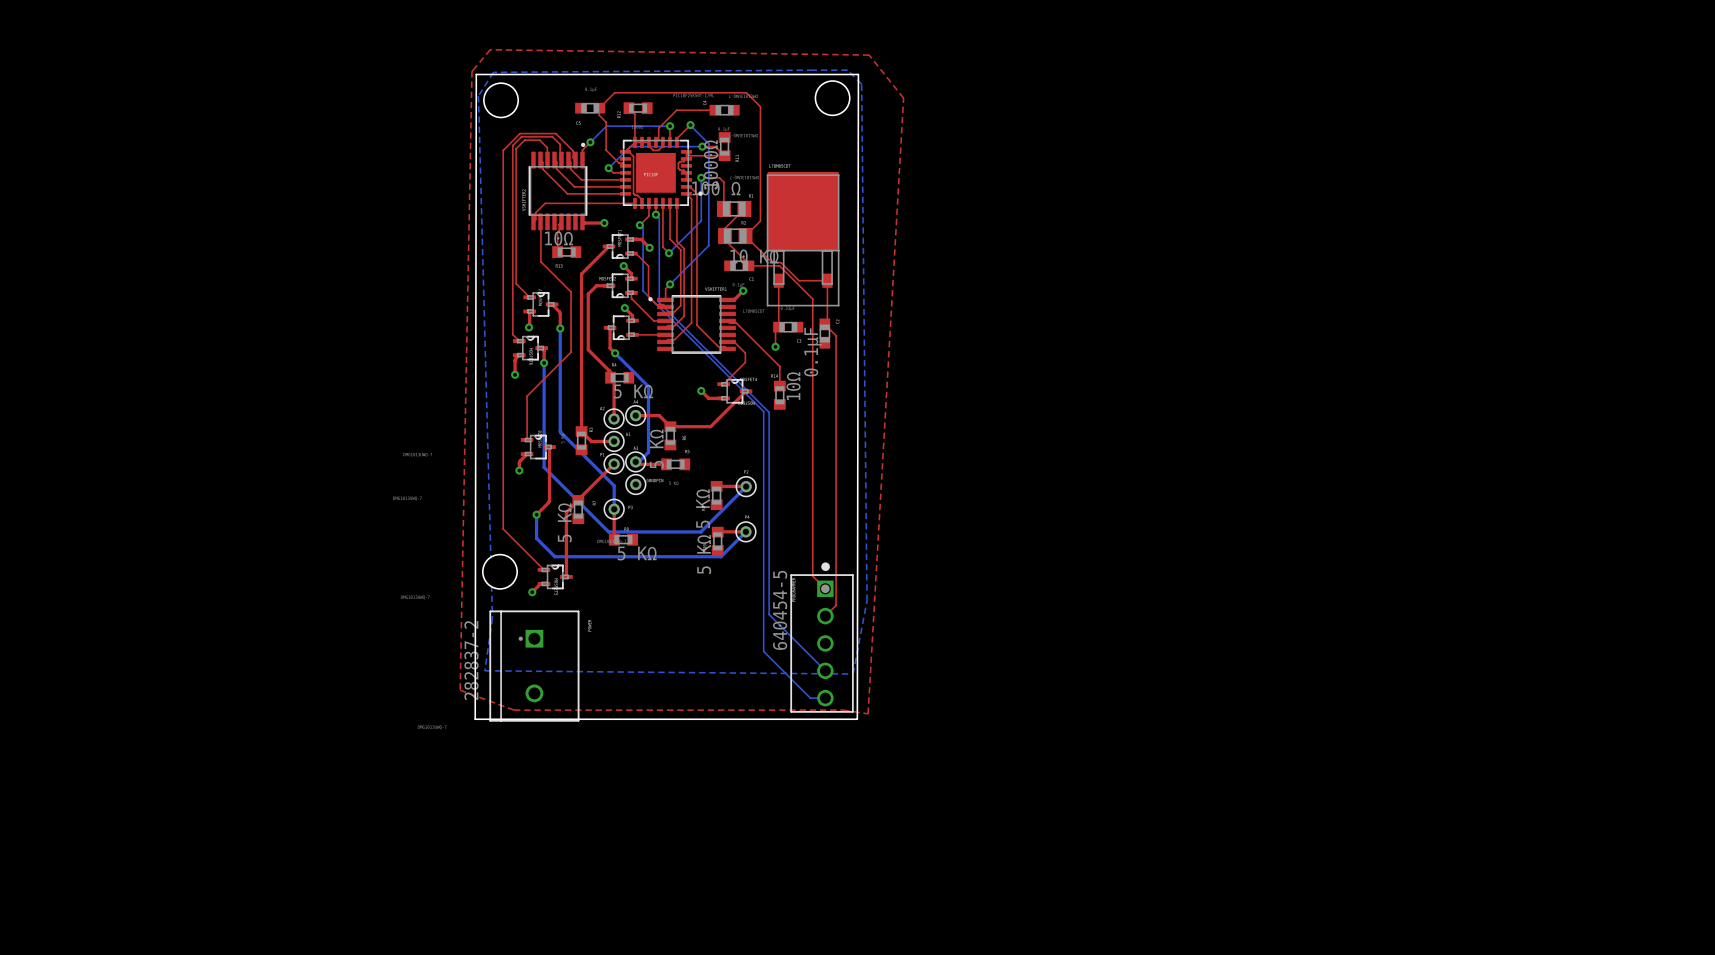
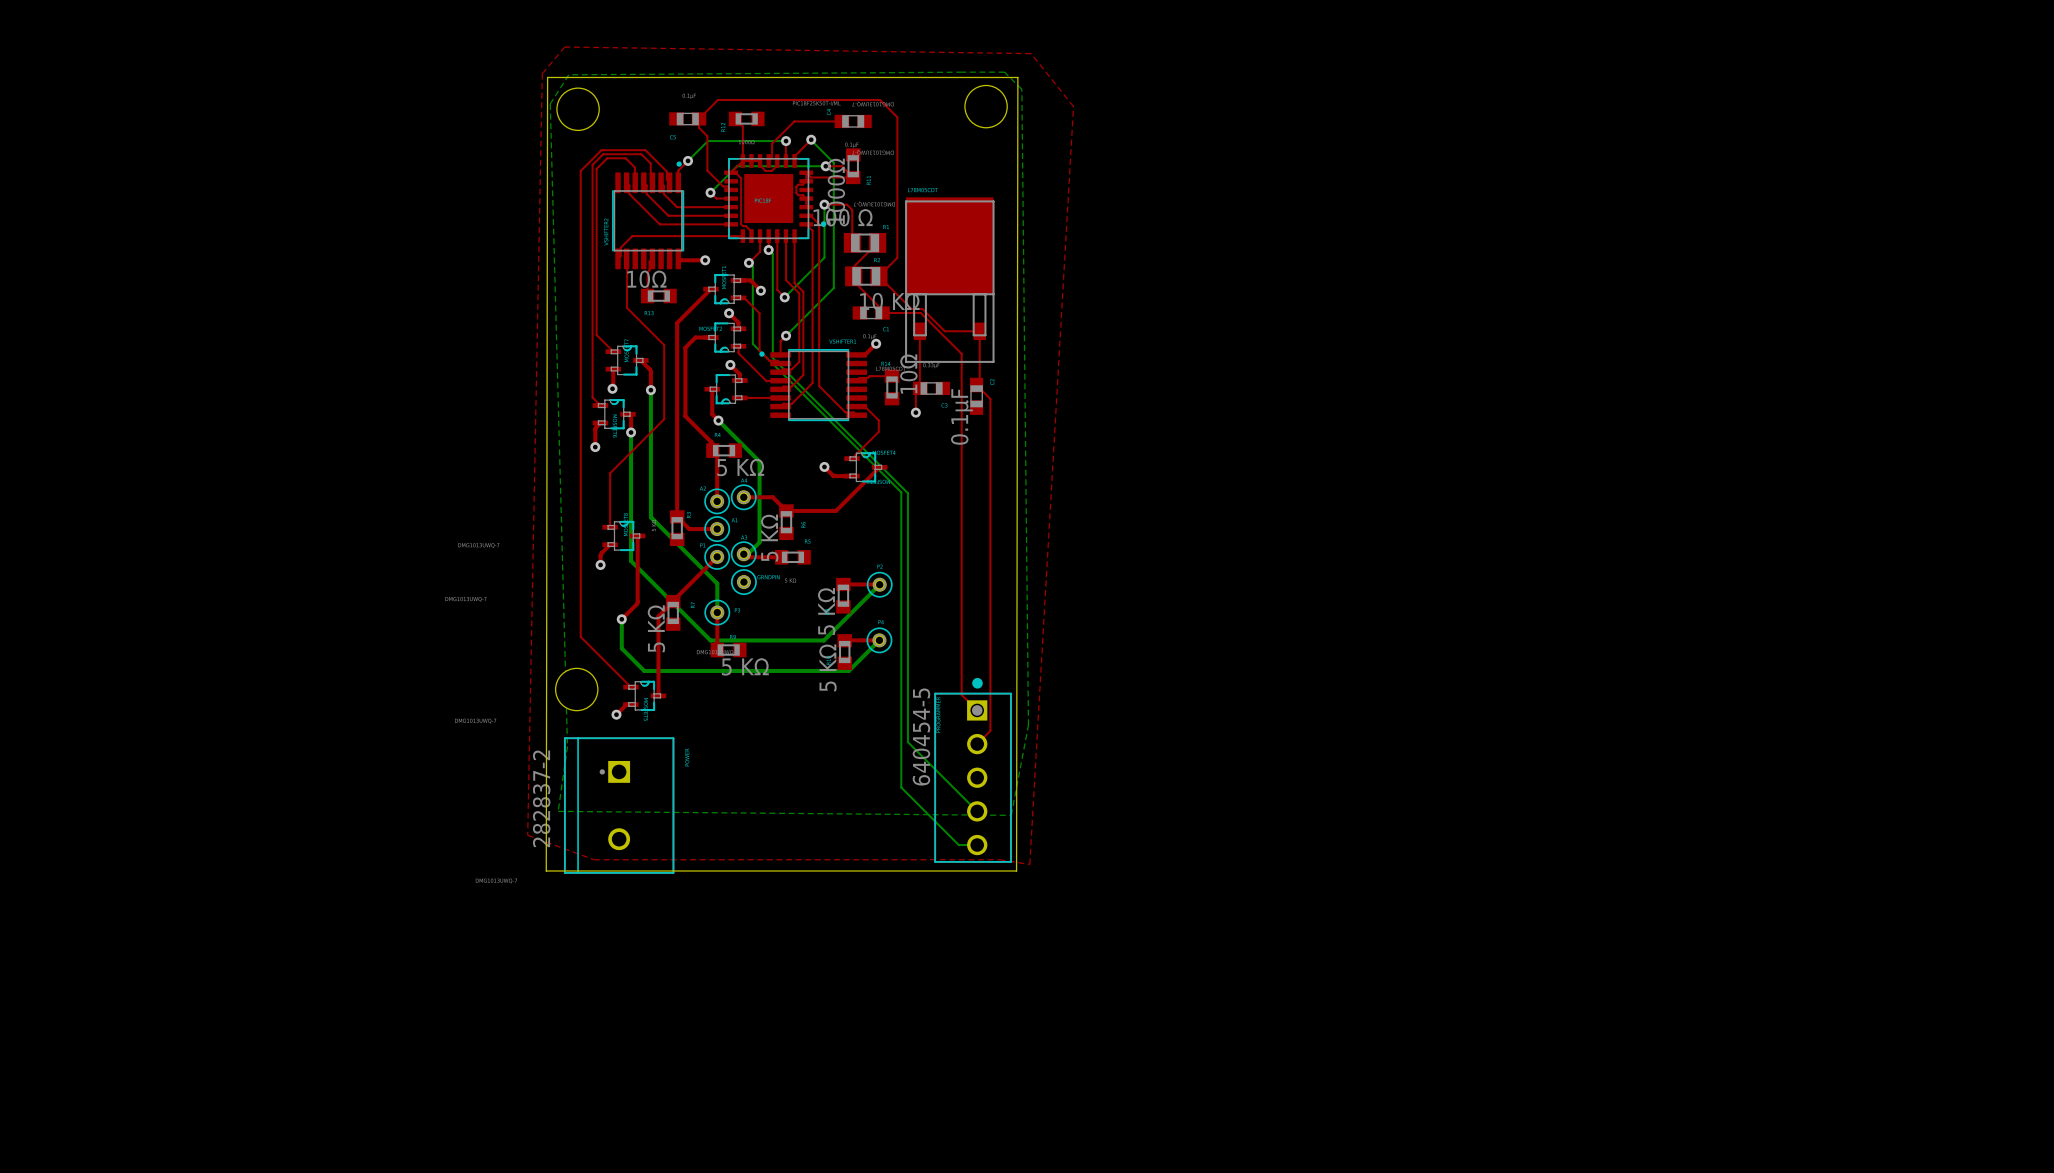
top track: (727, 320) (729, 323) (736, 323) (779, 366) (779, 386) -> (856, 380) (859, 377) (869, 376) (892, 376)
part position: (779, 395) -> (892, 387)

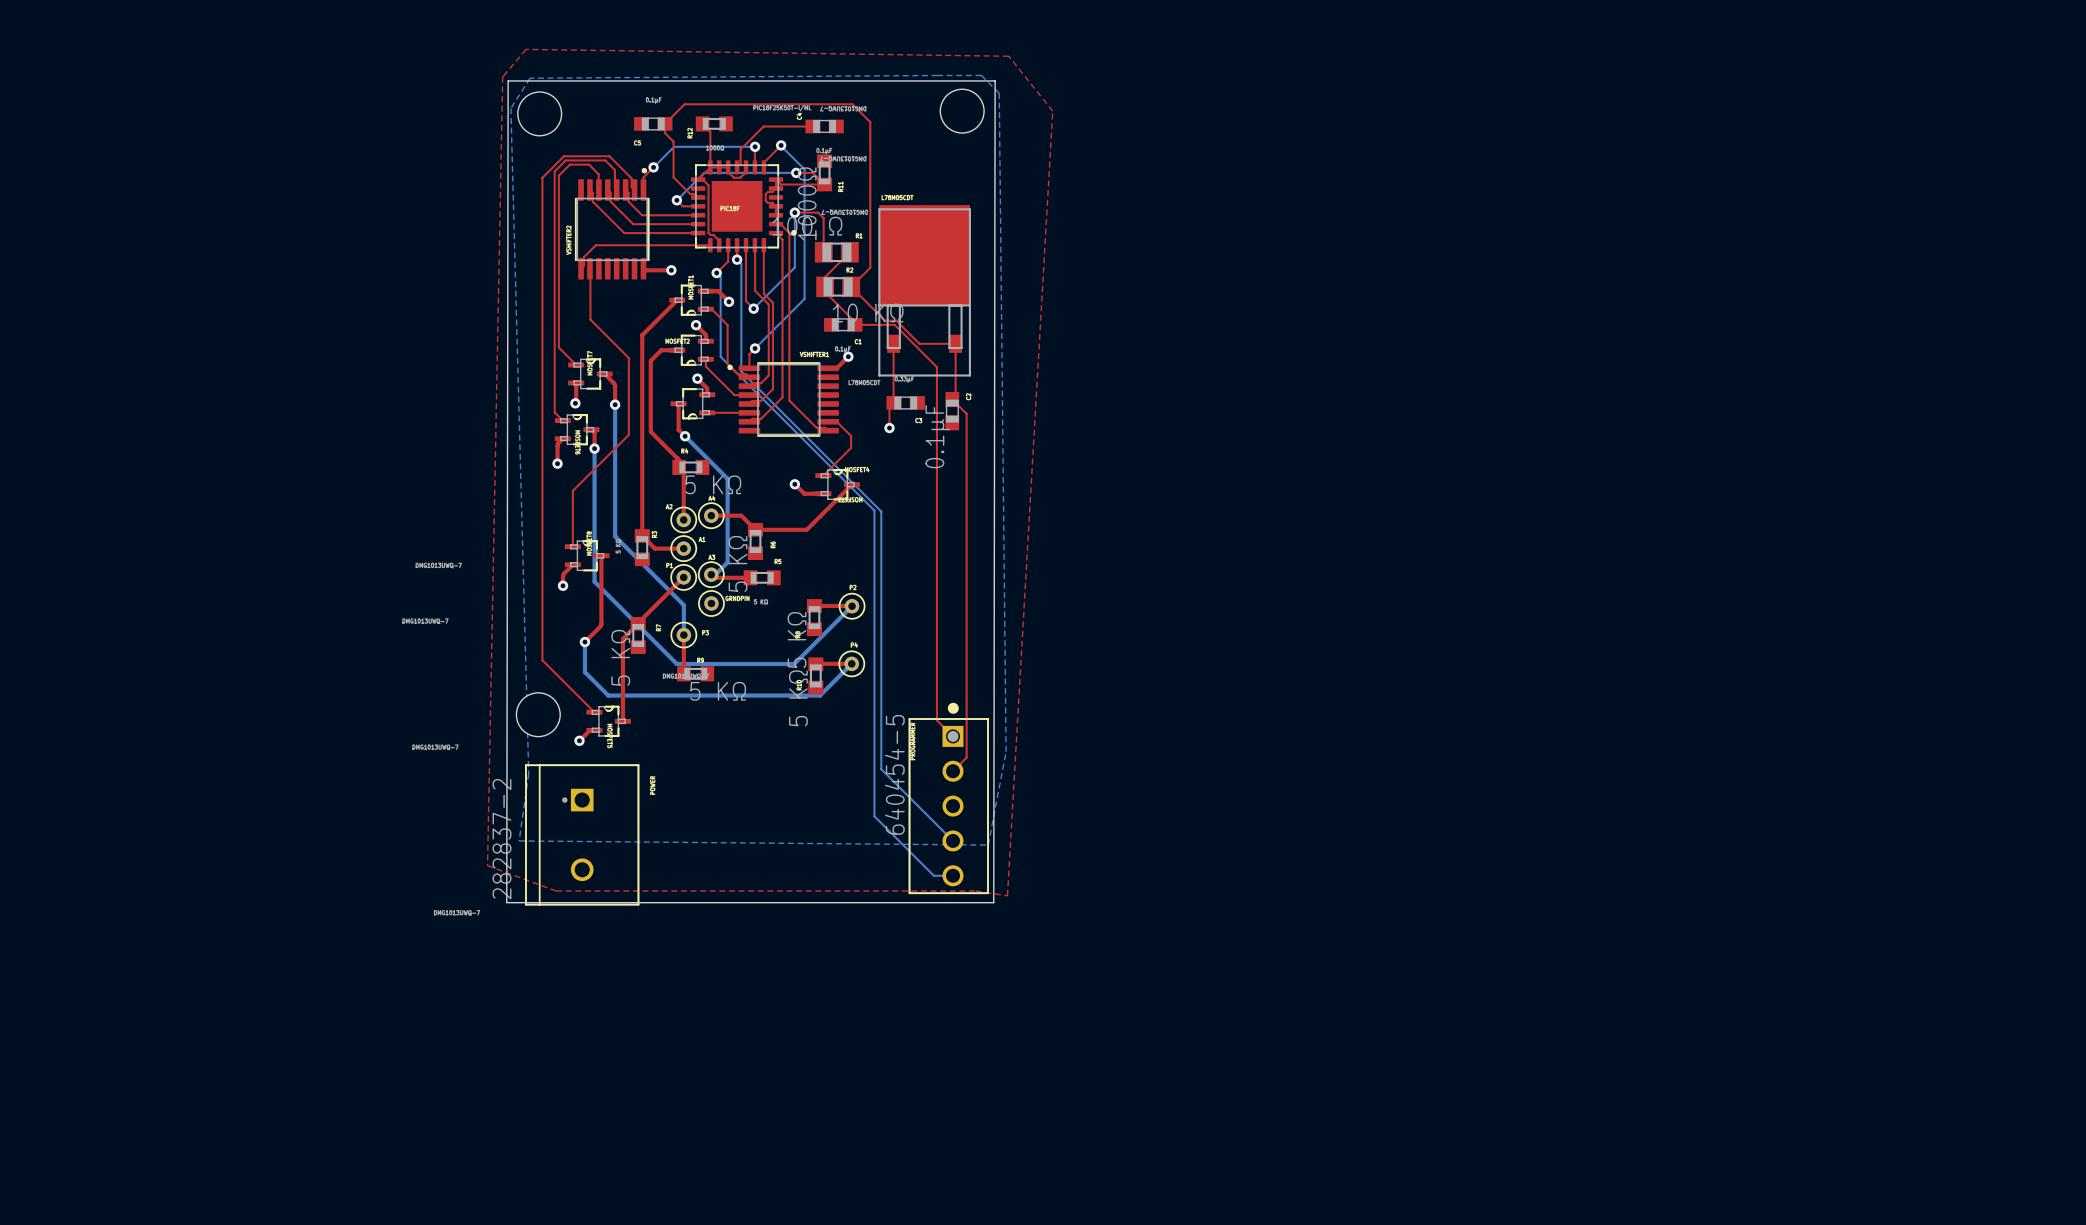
top track: (652, 258) (649, 261) (649, 270) (647, 272) (647, 296) -> none
part: 10Ω (658, 296) -> none
top track: (892, 376) (869, 376) (859, 377) (856, 380) -> none
part: 10Ω (892, 387) -> none

